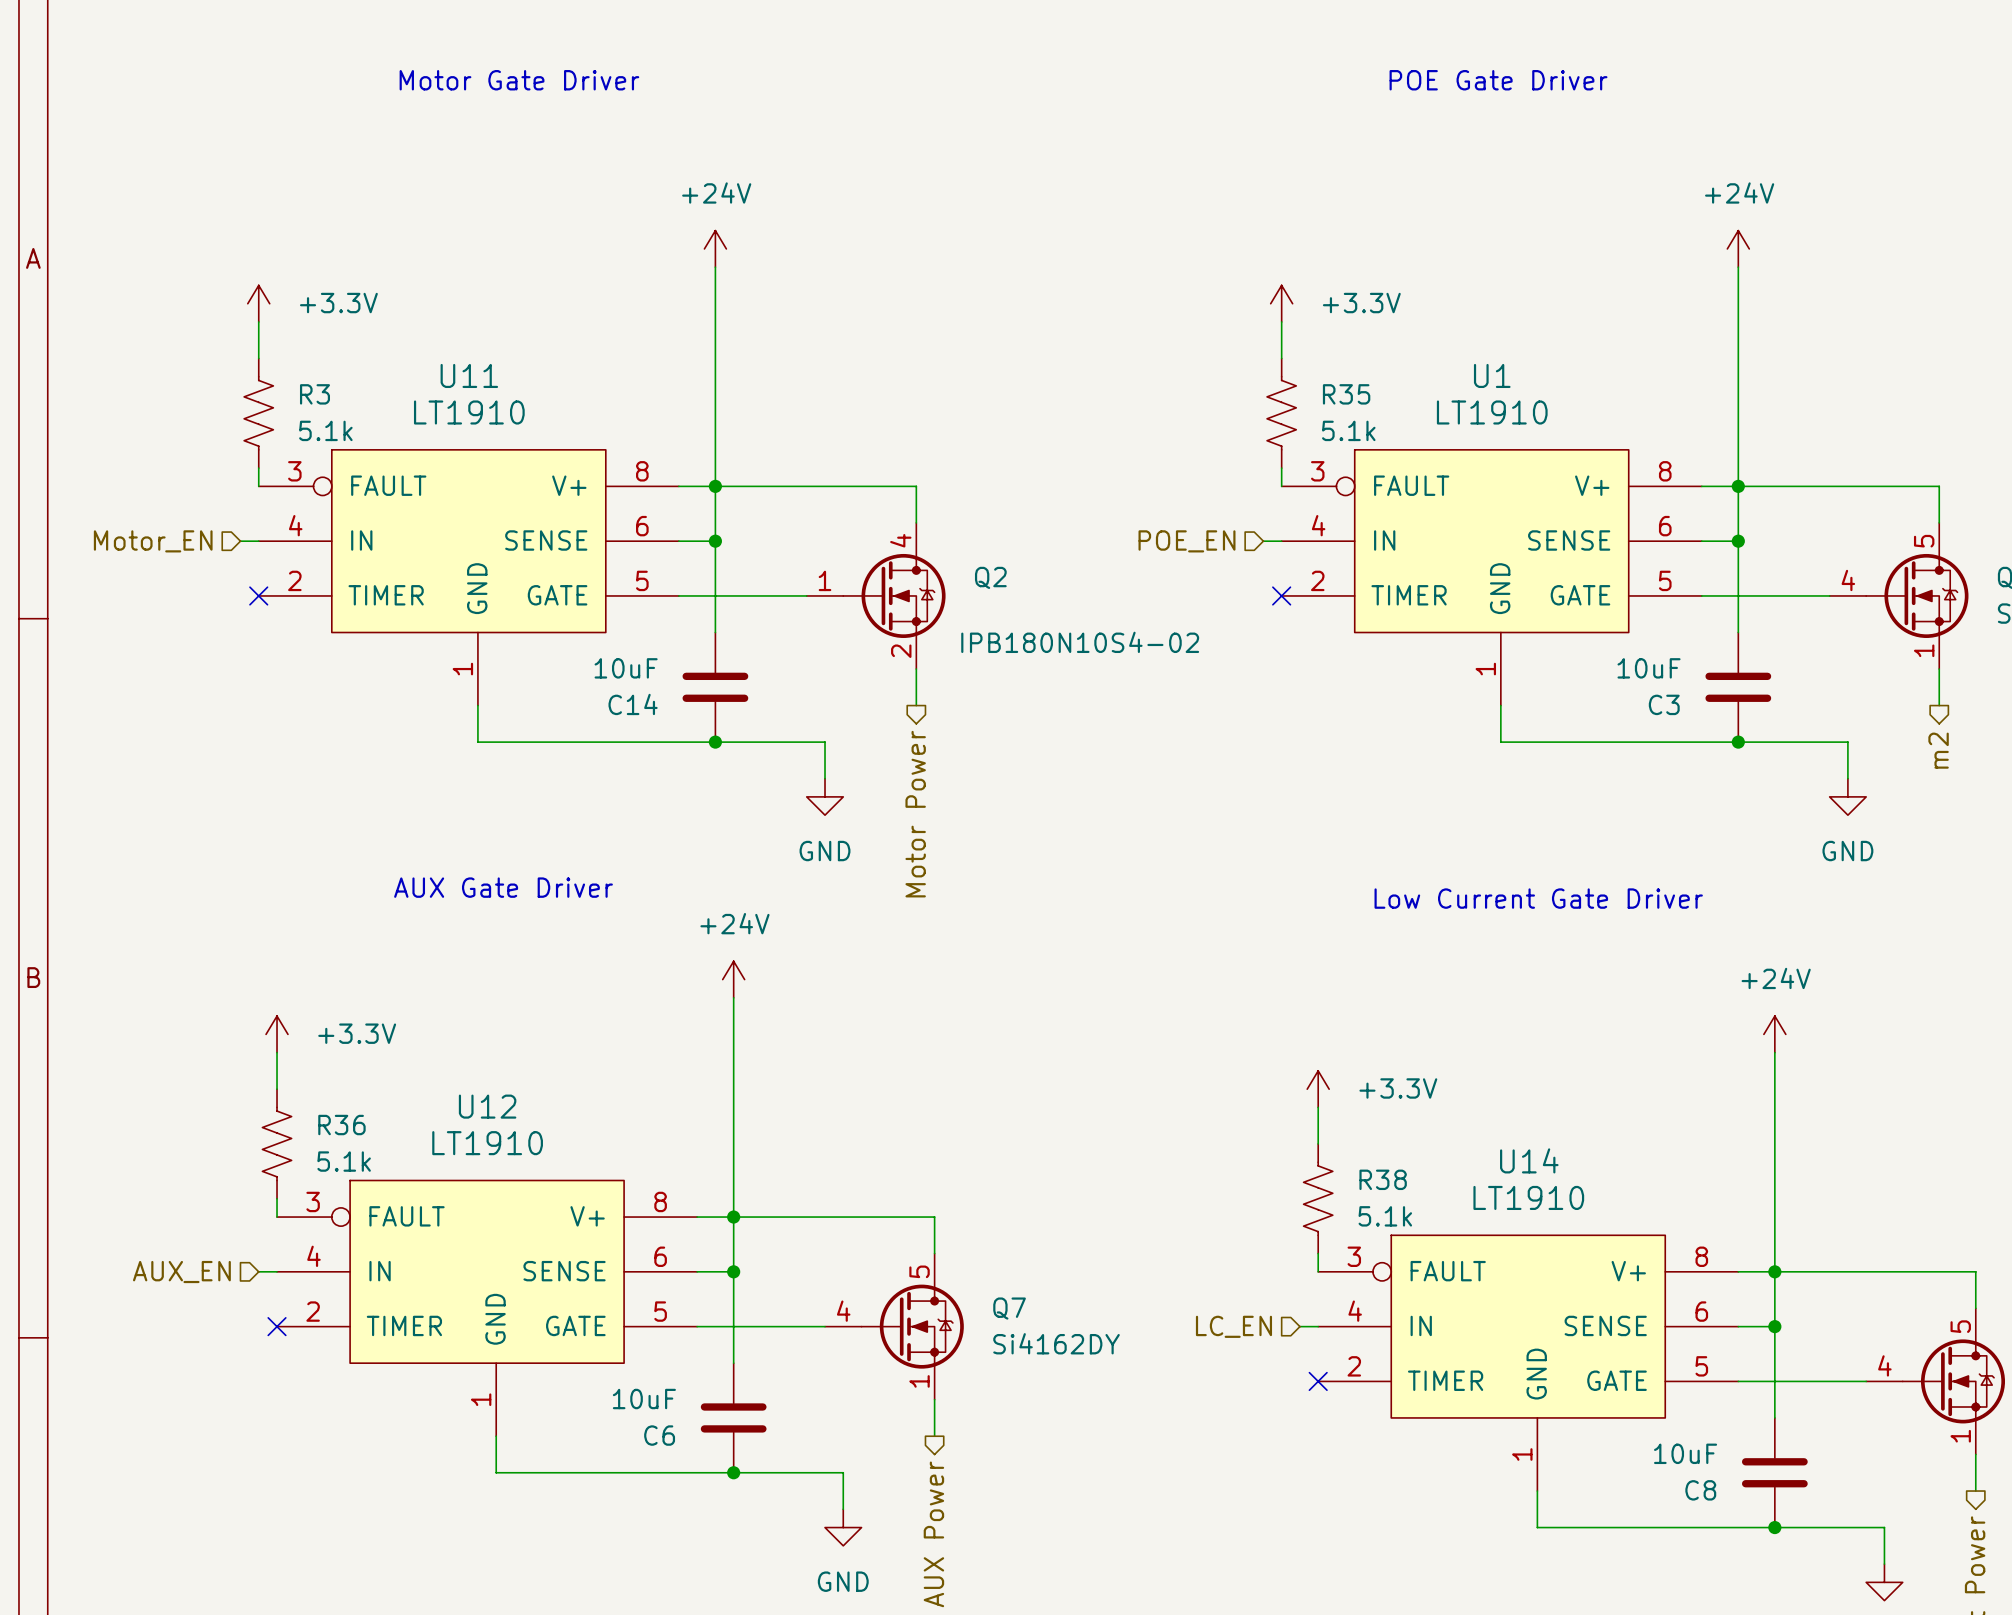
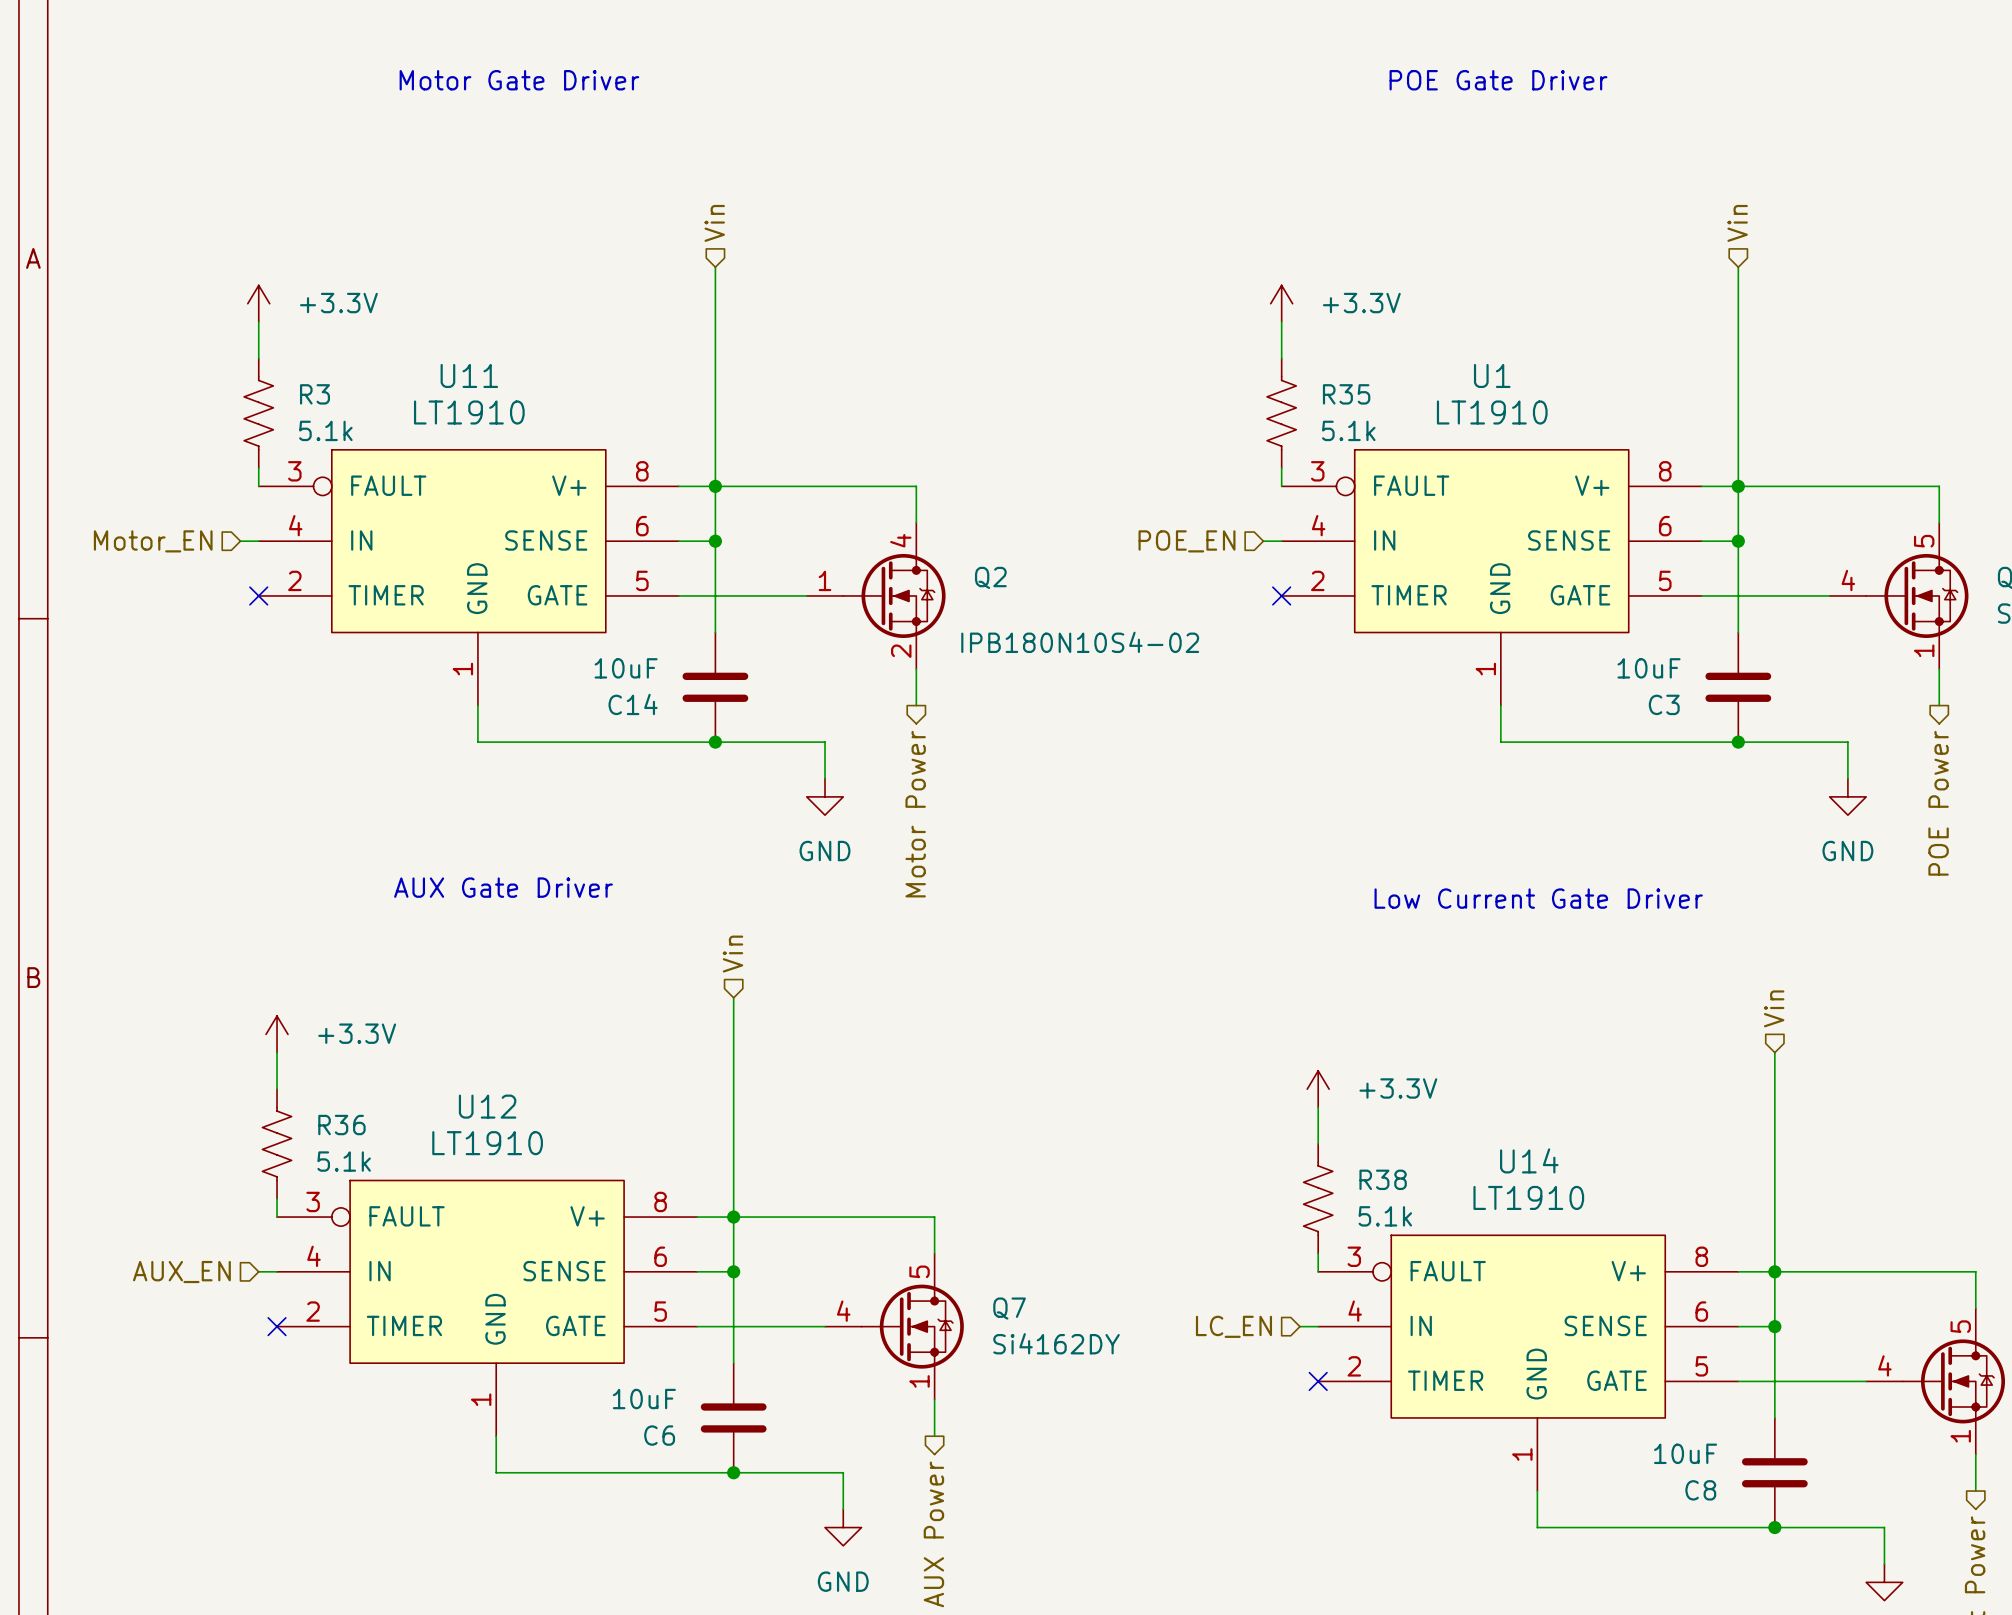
hierarchical label: none -> Vin (714, 223)
hierarchical label: none -> Vin (1737, 223)
power symbol: +24V (715, 248) -> none
power symbol: +24V (1738, 248) -> none
hierarchical label: m2 (1938, 750) -> POE Power (1938, 803)
hierarchical label: none -> Vin (732, 954)
power symbol: +24V (733, 979) -> none
hierarchical label: none -> Vin (1774, 1008)
power symbol: +24V (1774, 1034) -> none

